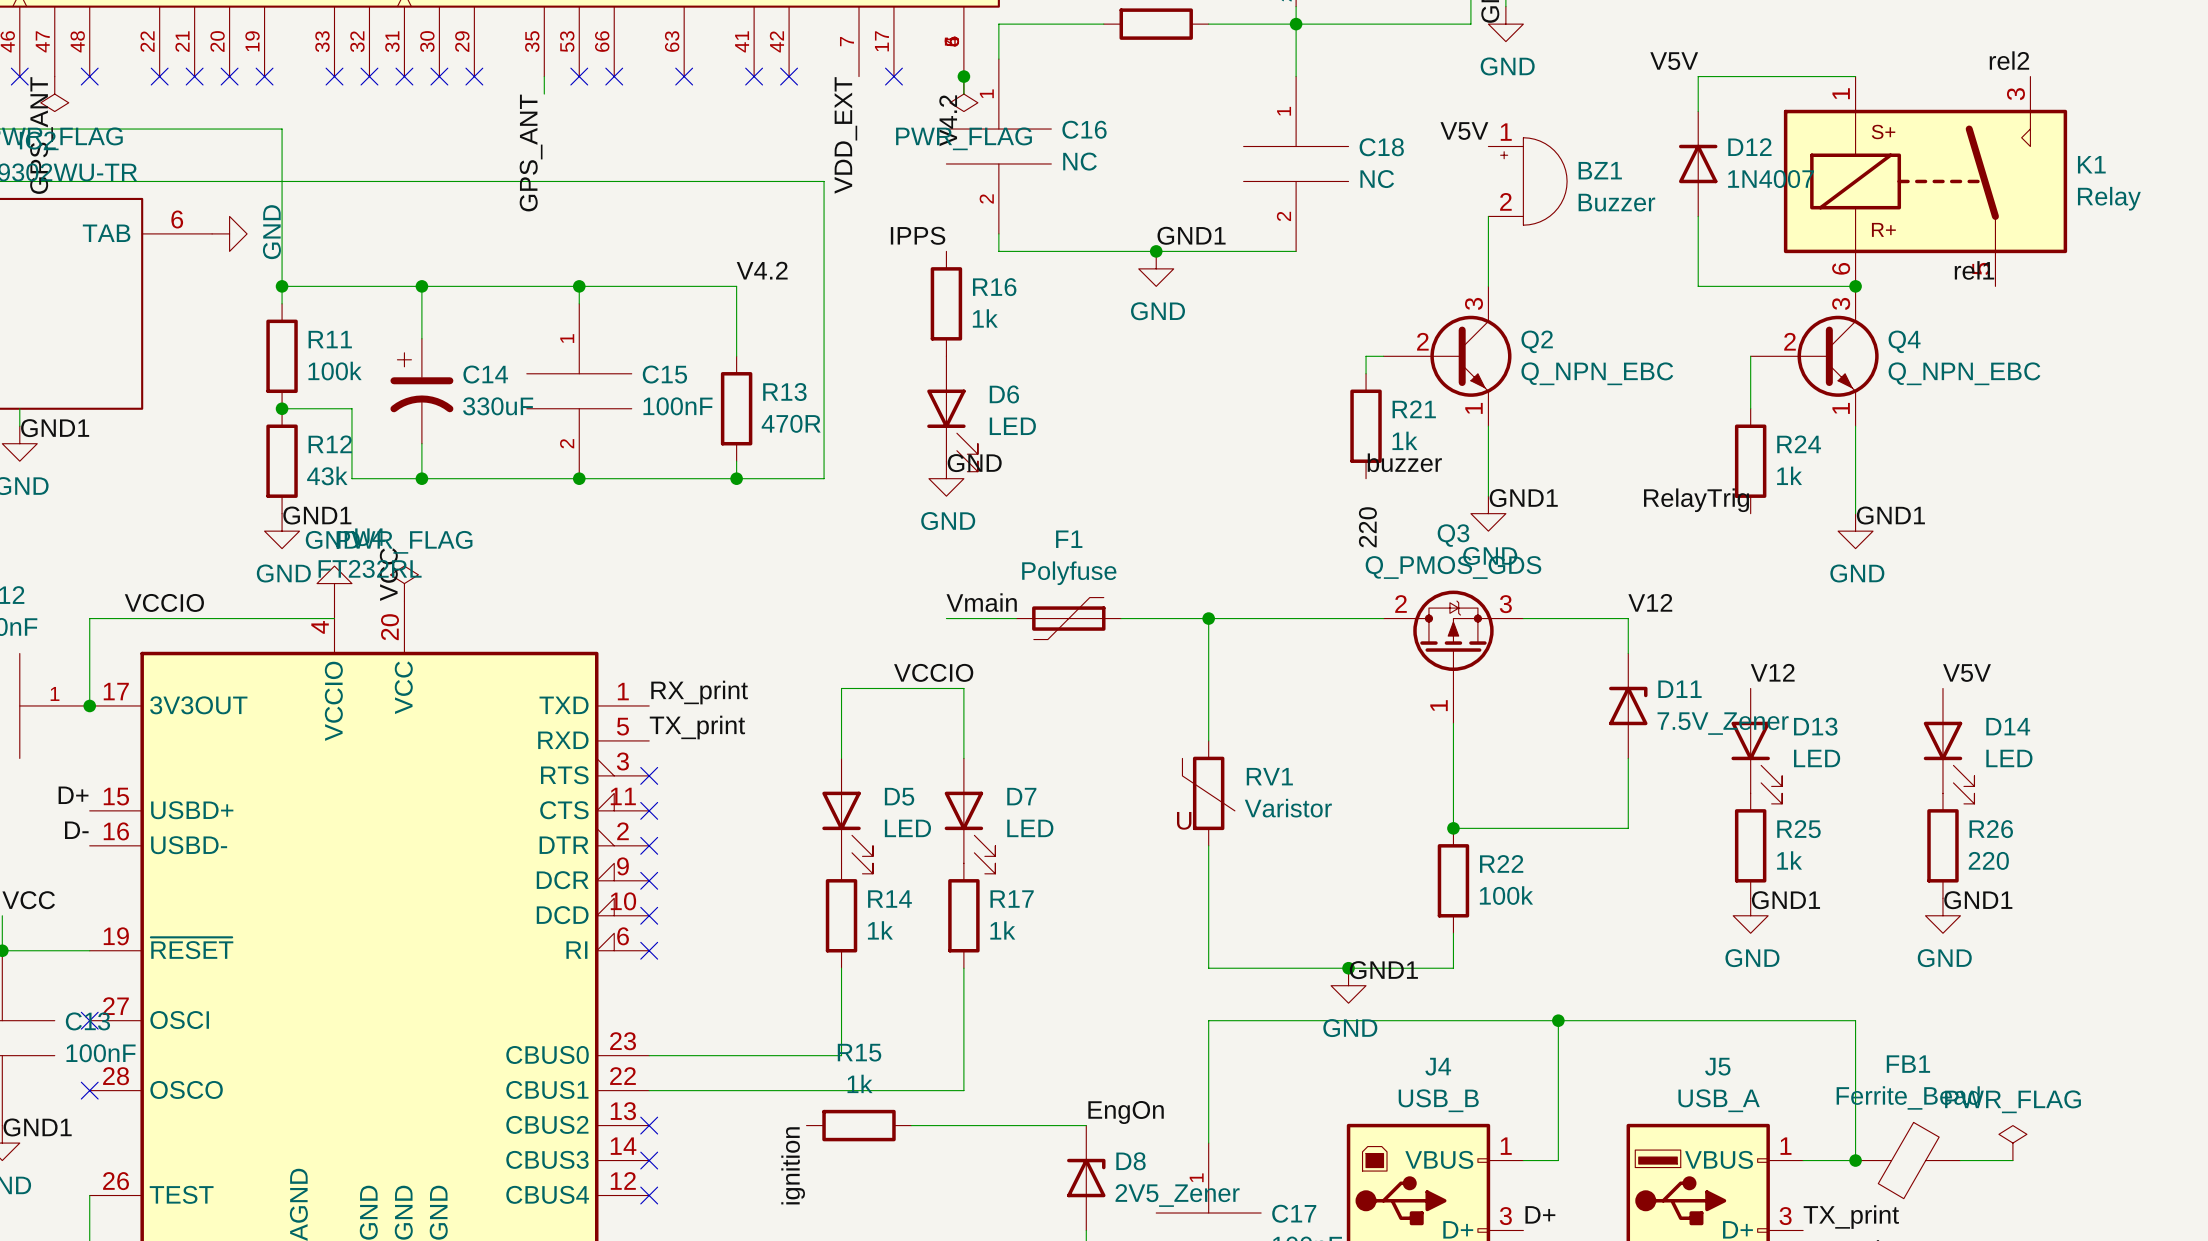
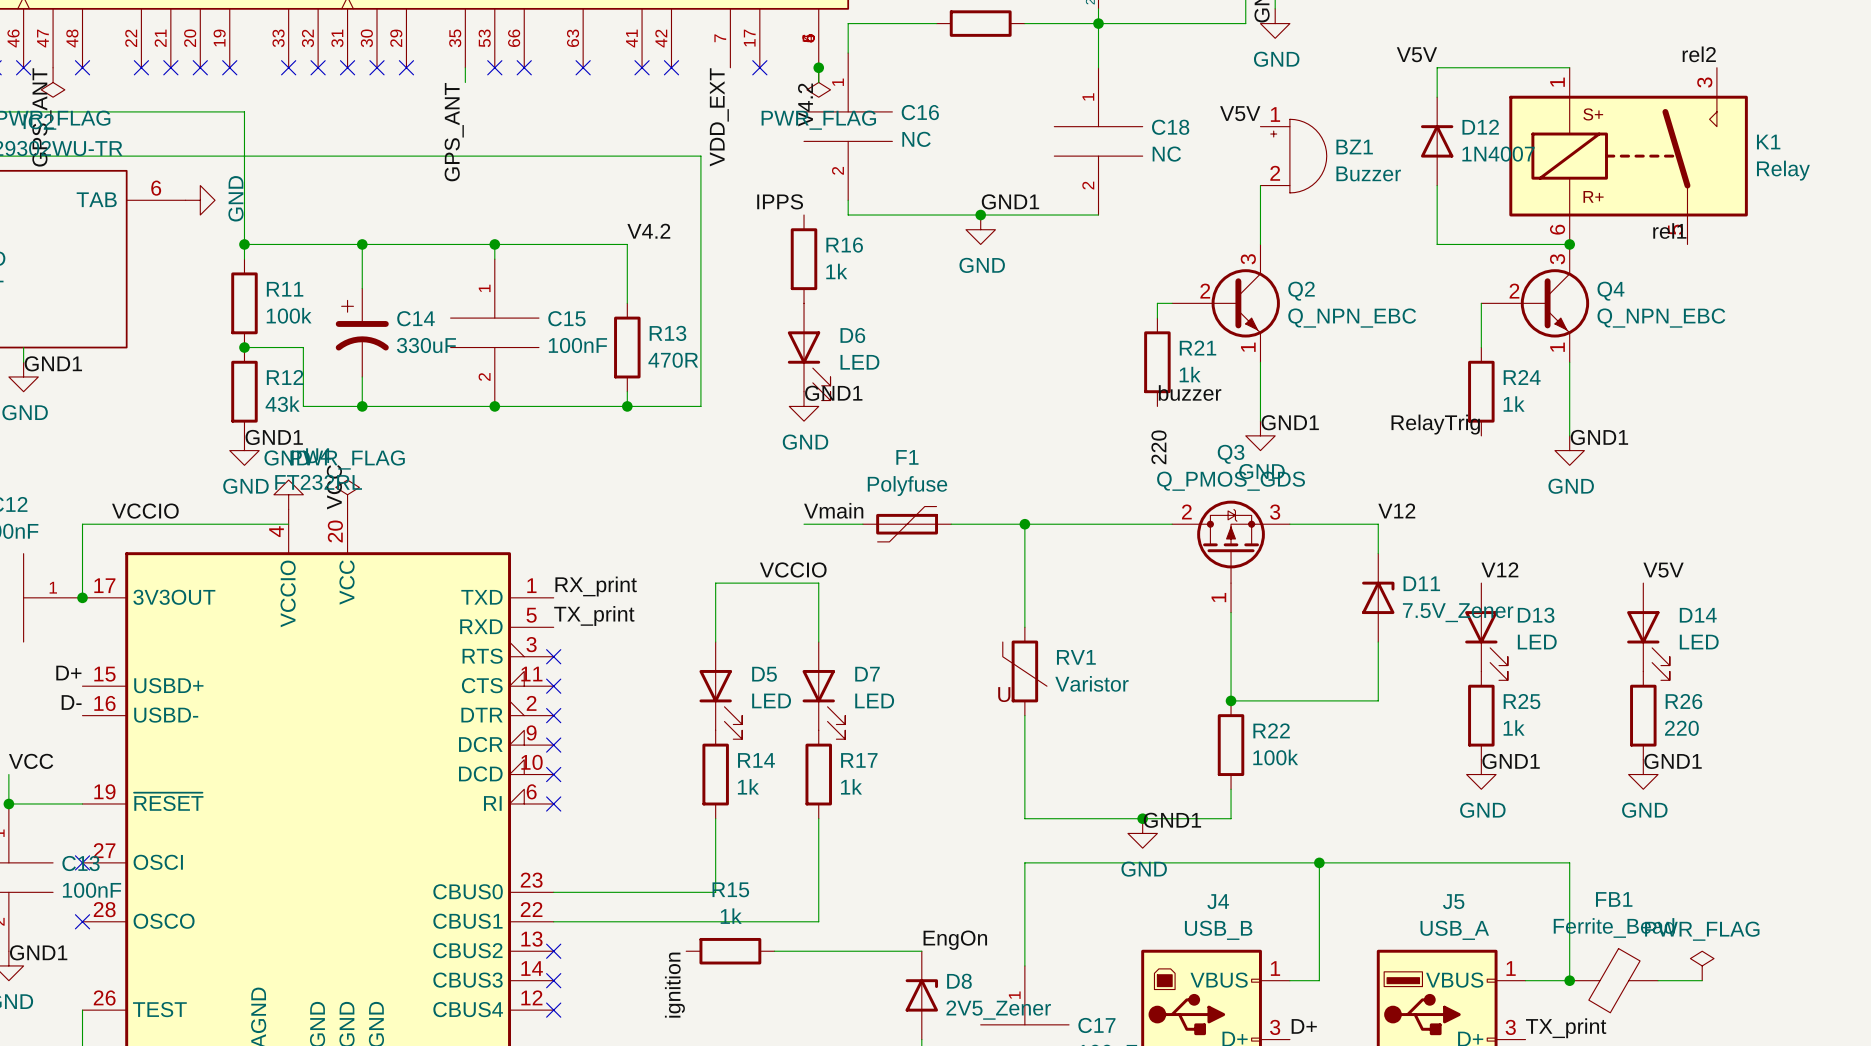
label: GND (974, 463) -> GND1 (833, 393)

